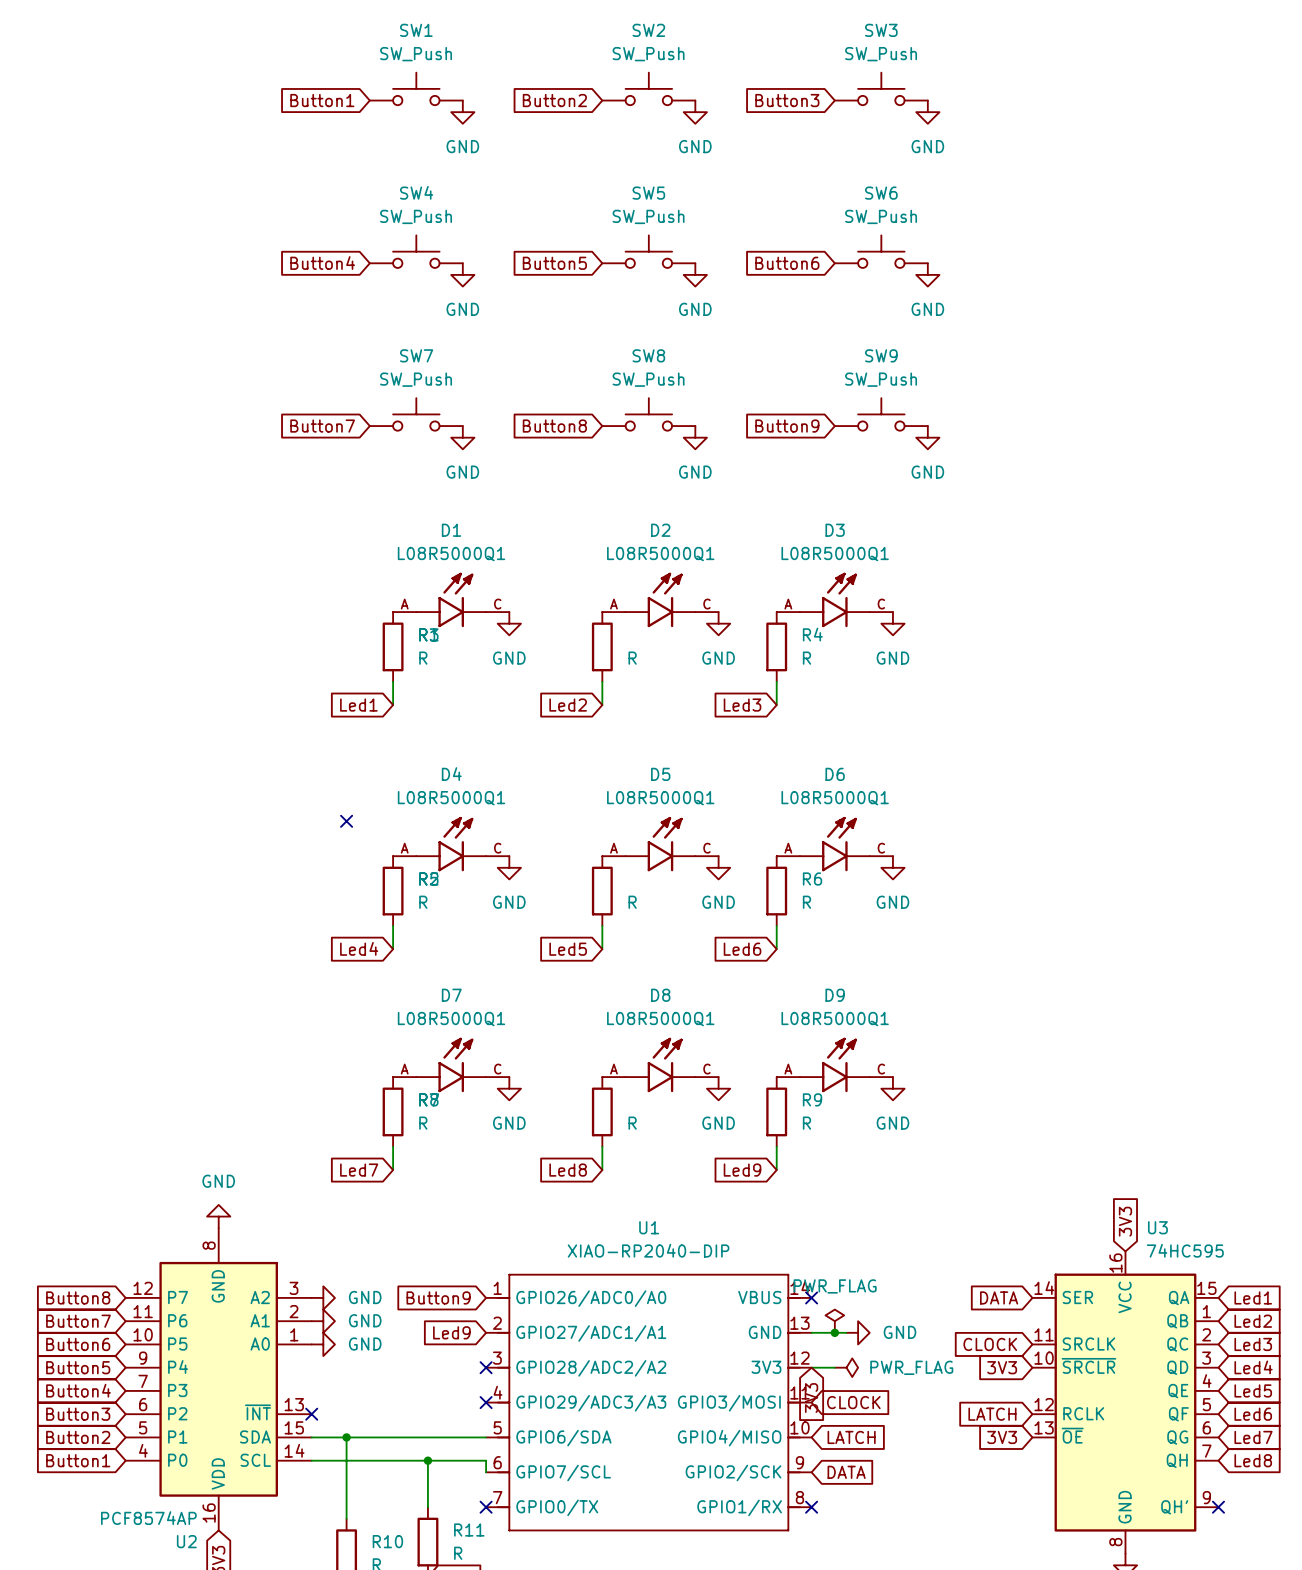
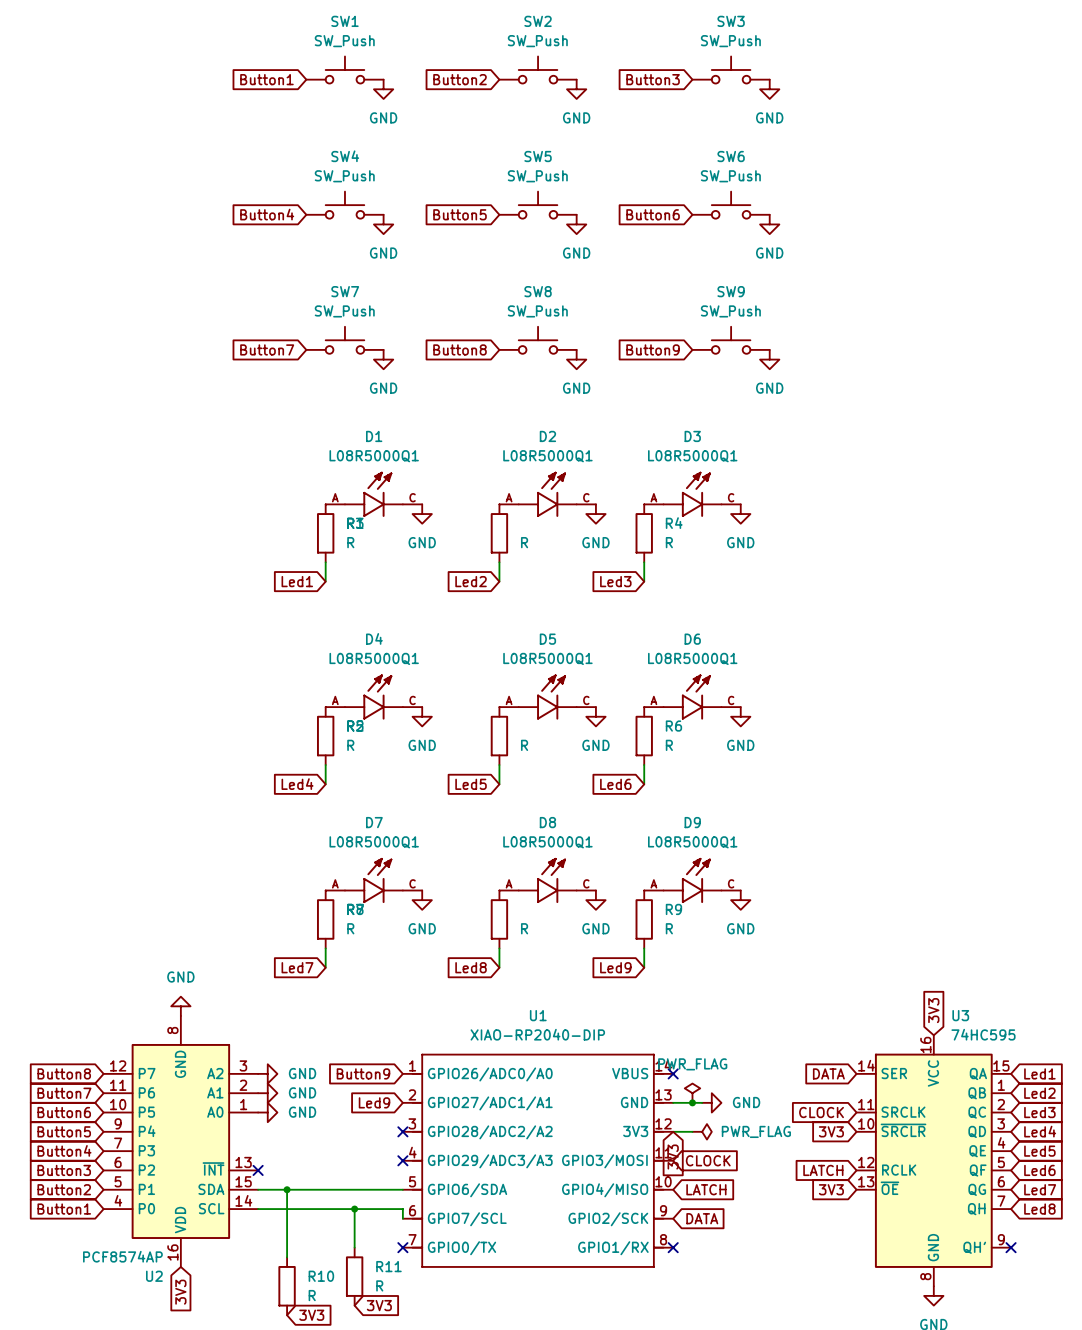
no-connect mark: (346, 821) -> none

